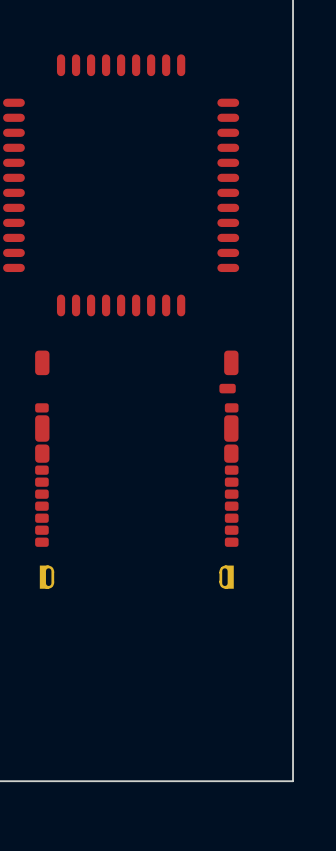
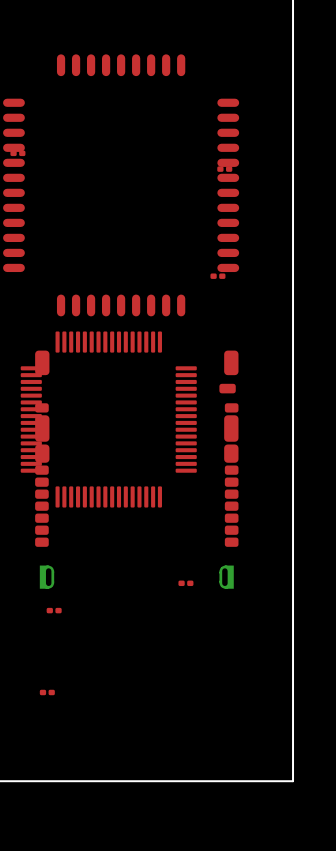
part: none -> (17, 153)
part: none -> (224, 169)
part: none -> (217, 276)
part: none -> (108, 419)
part: none -> (185, 583)
part: none -> (54, 610)
part: none -> (47, 692)

